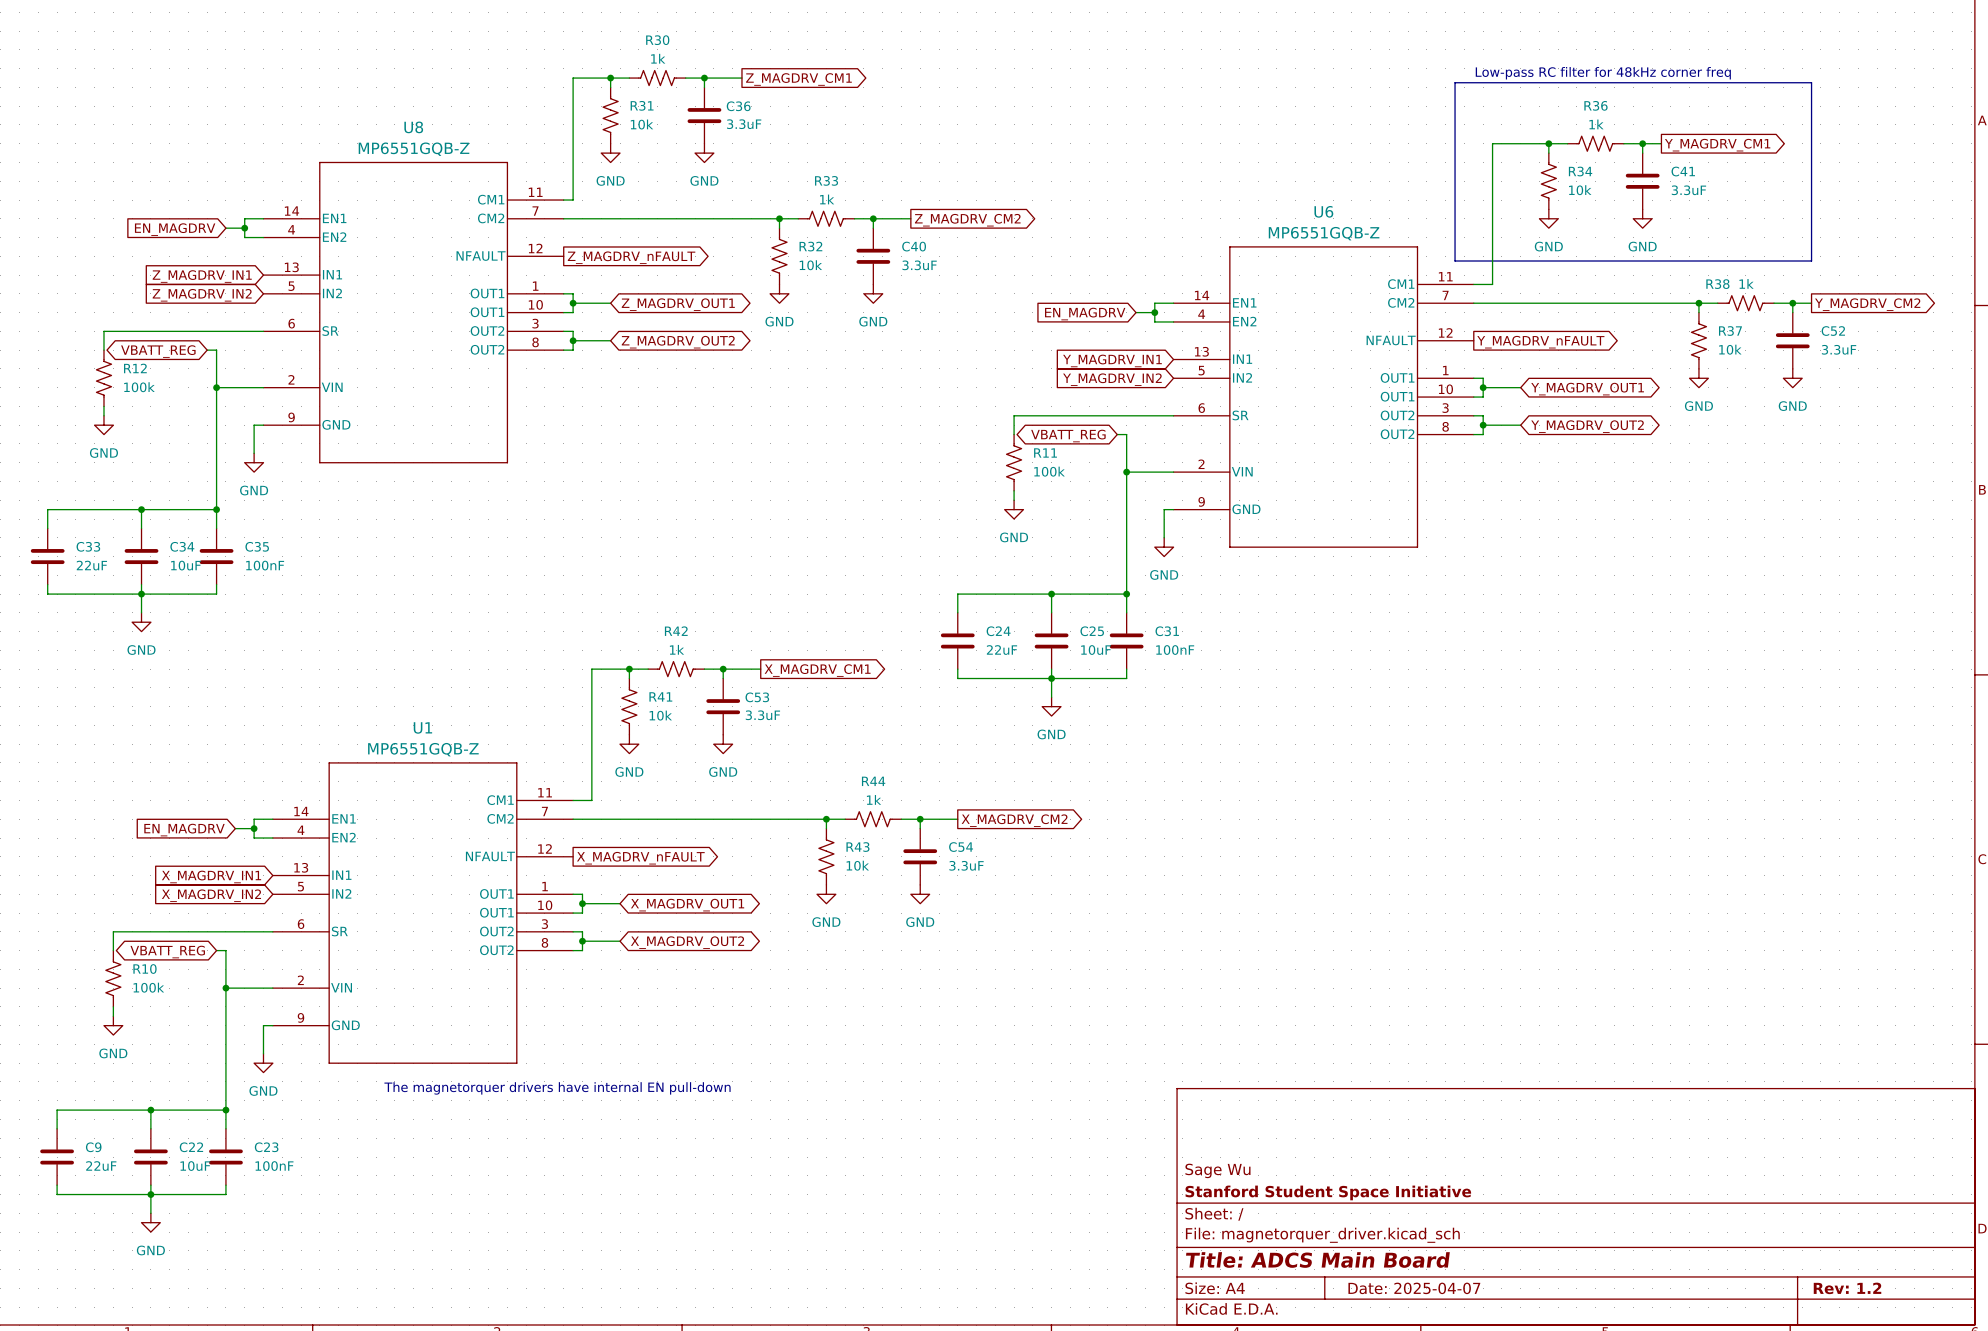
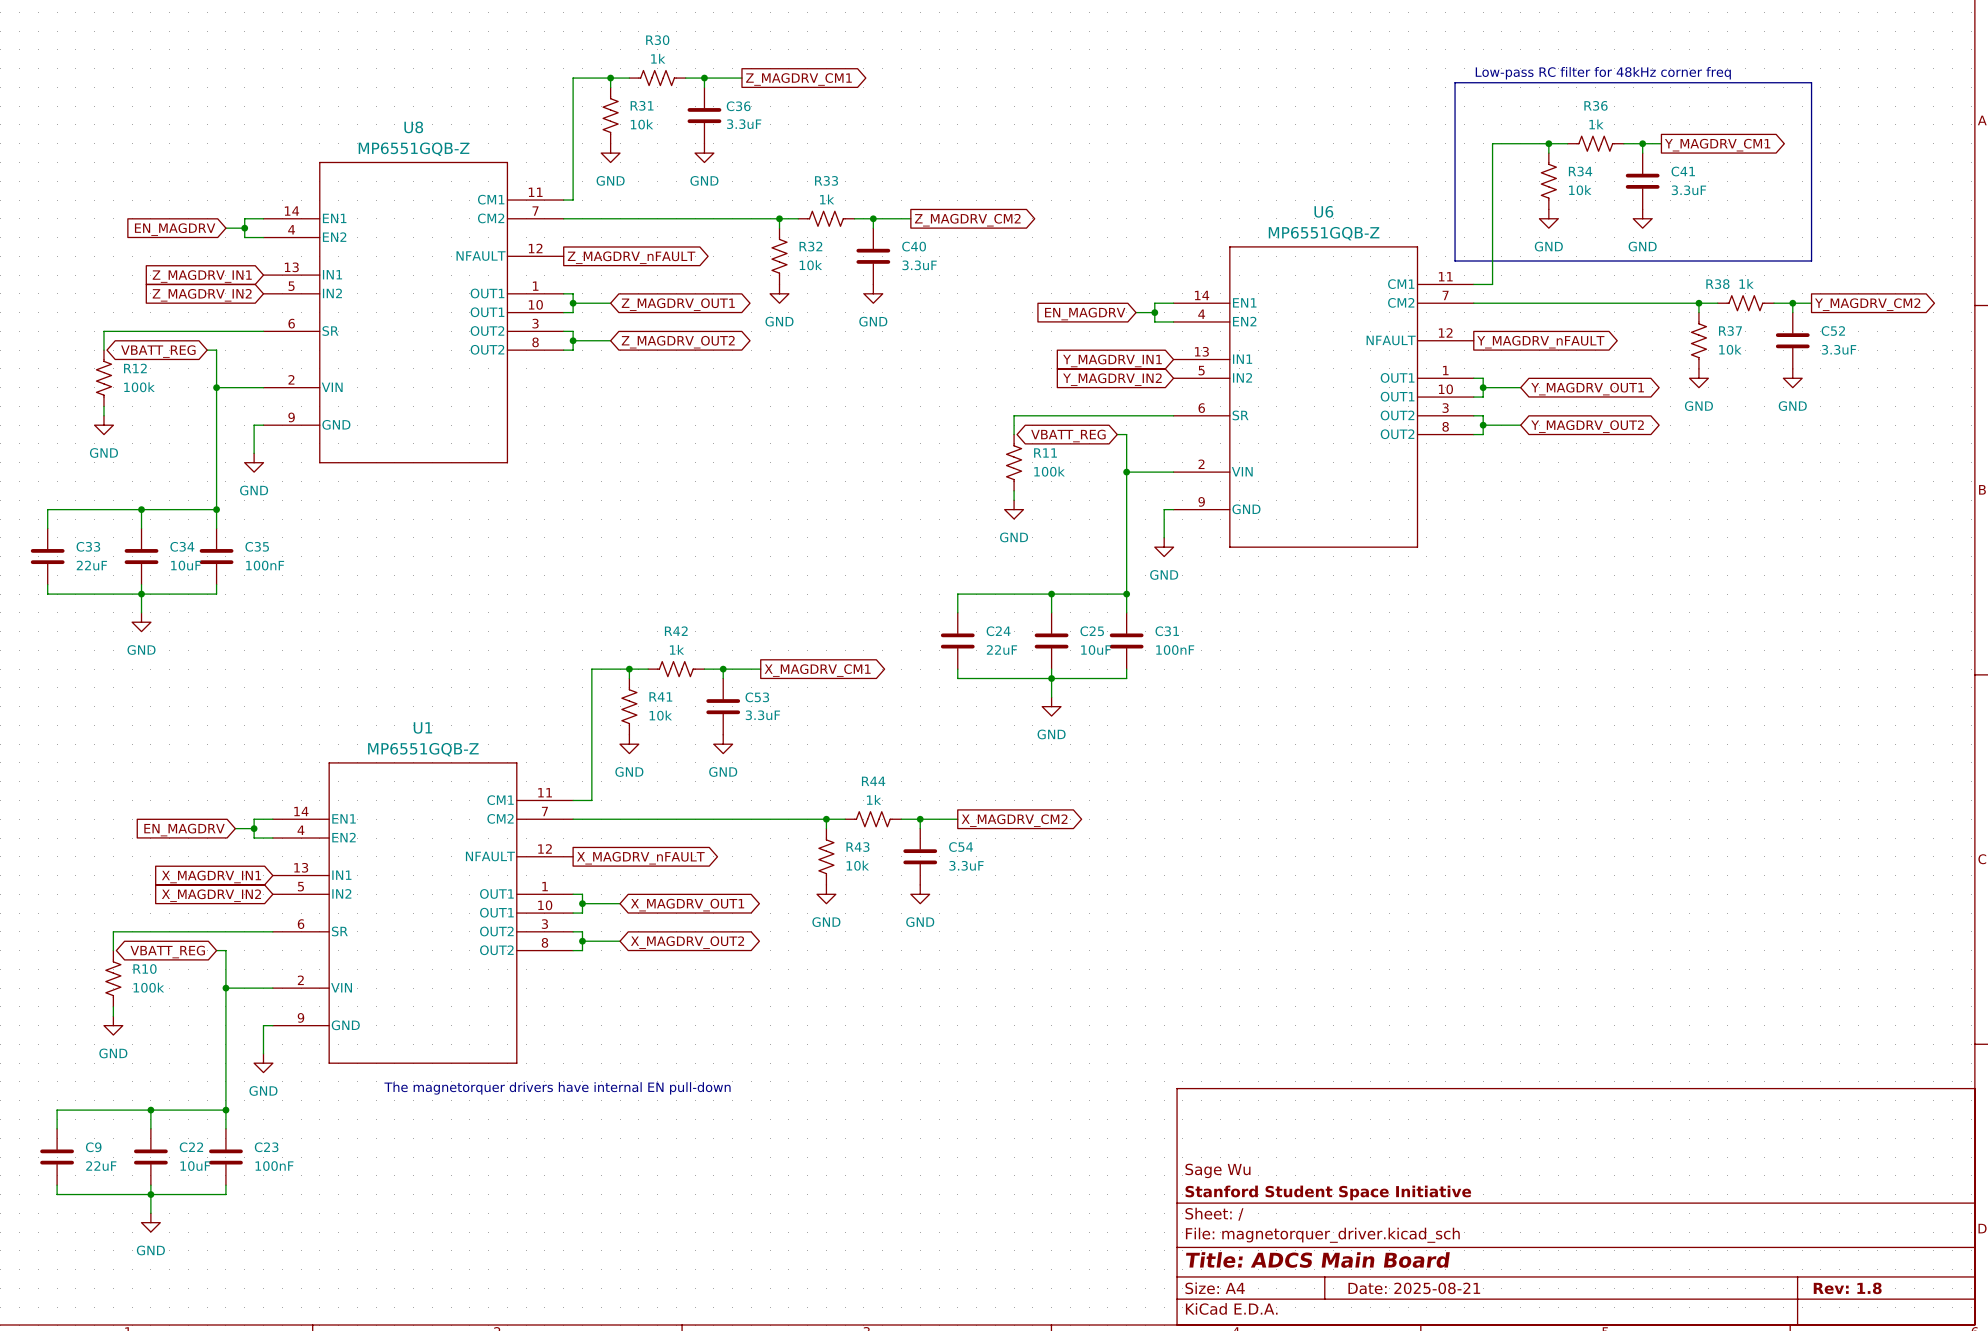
title block: Date: 2025-04-07 (1414, 1288) -> Date: 2025-08-21 (1414, 1288)
title block: Rev: 1.2 (1847, 1288) -> Rev: 1.8 (1847, 1288)

